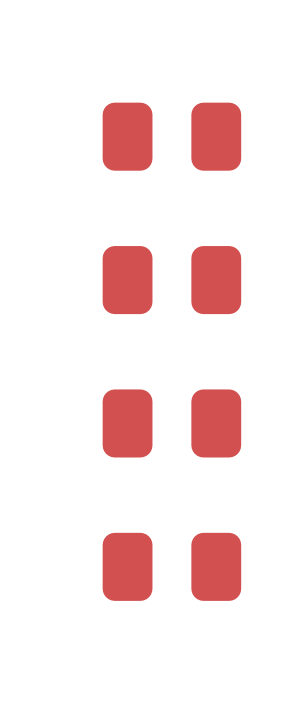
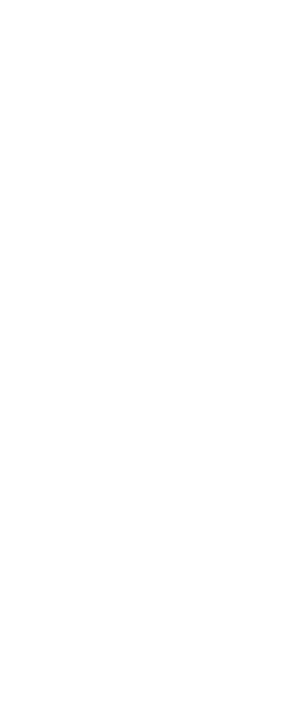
part: (171, 136) -> none
part: (171, 280) -> none
part: (171, 423) -> none
part: (171, 566) -> none

